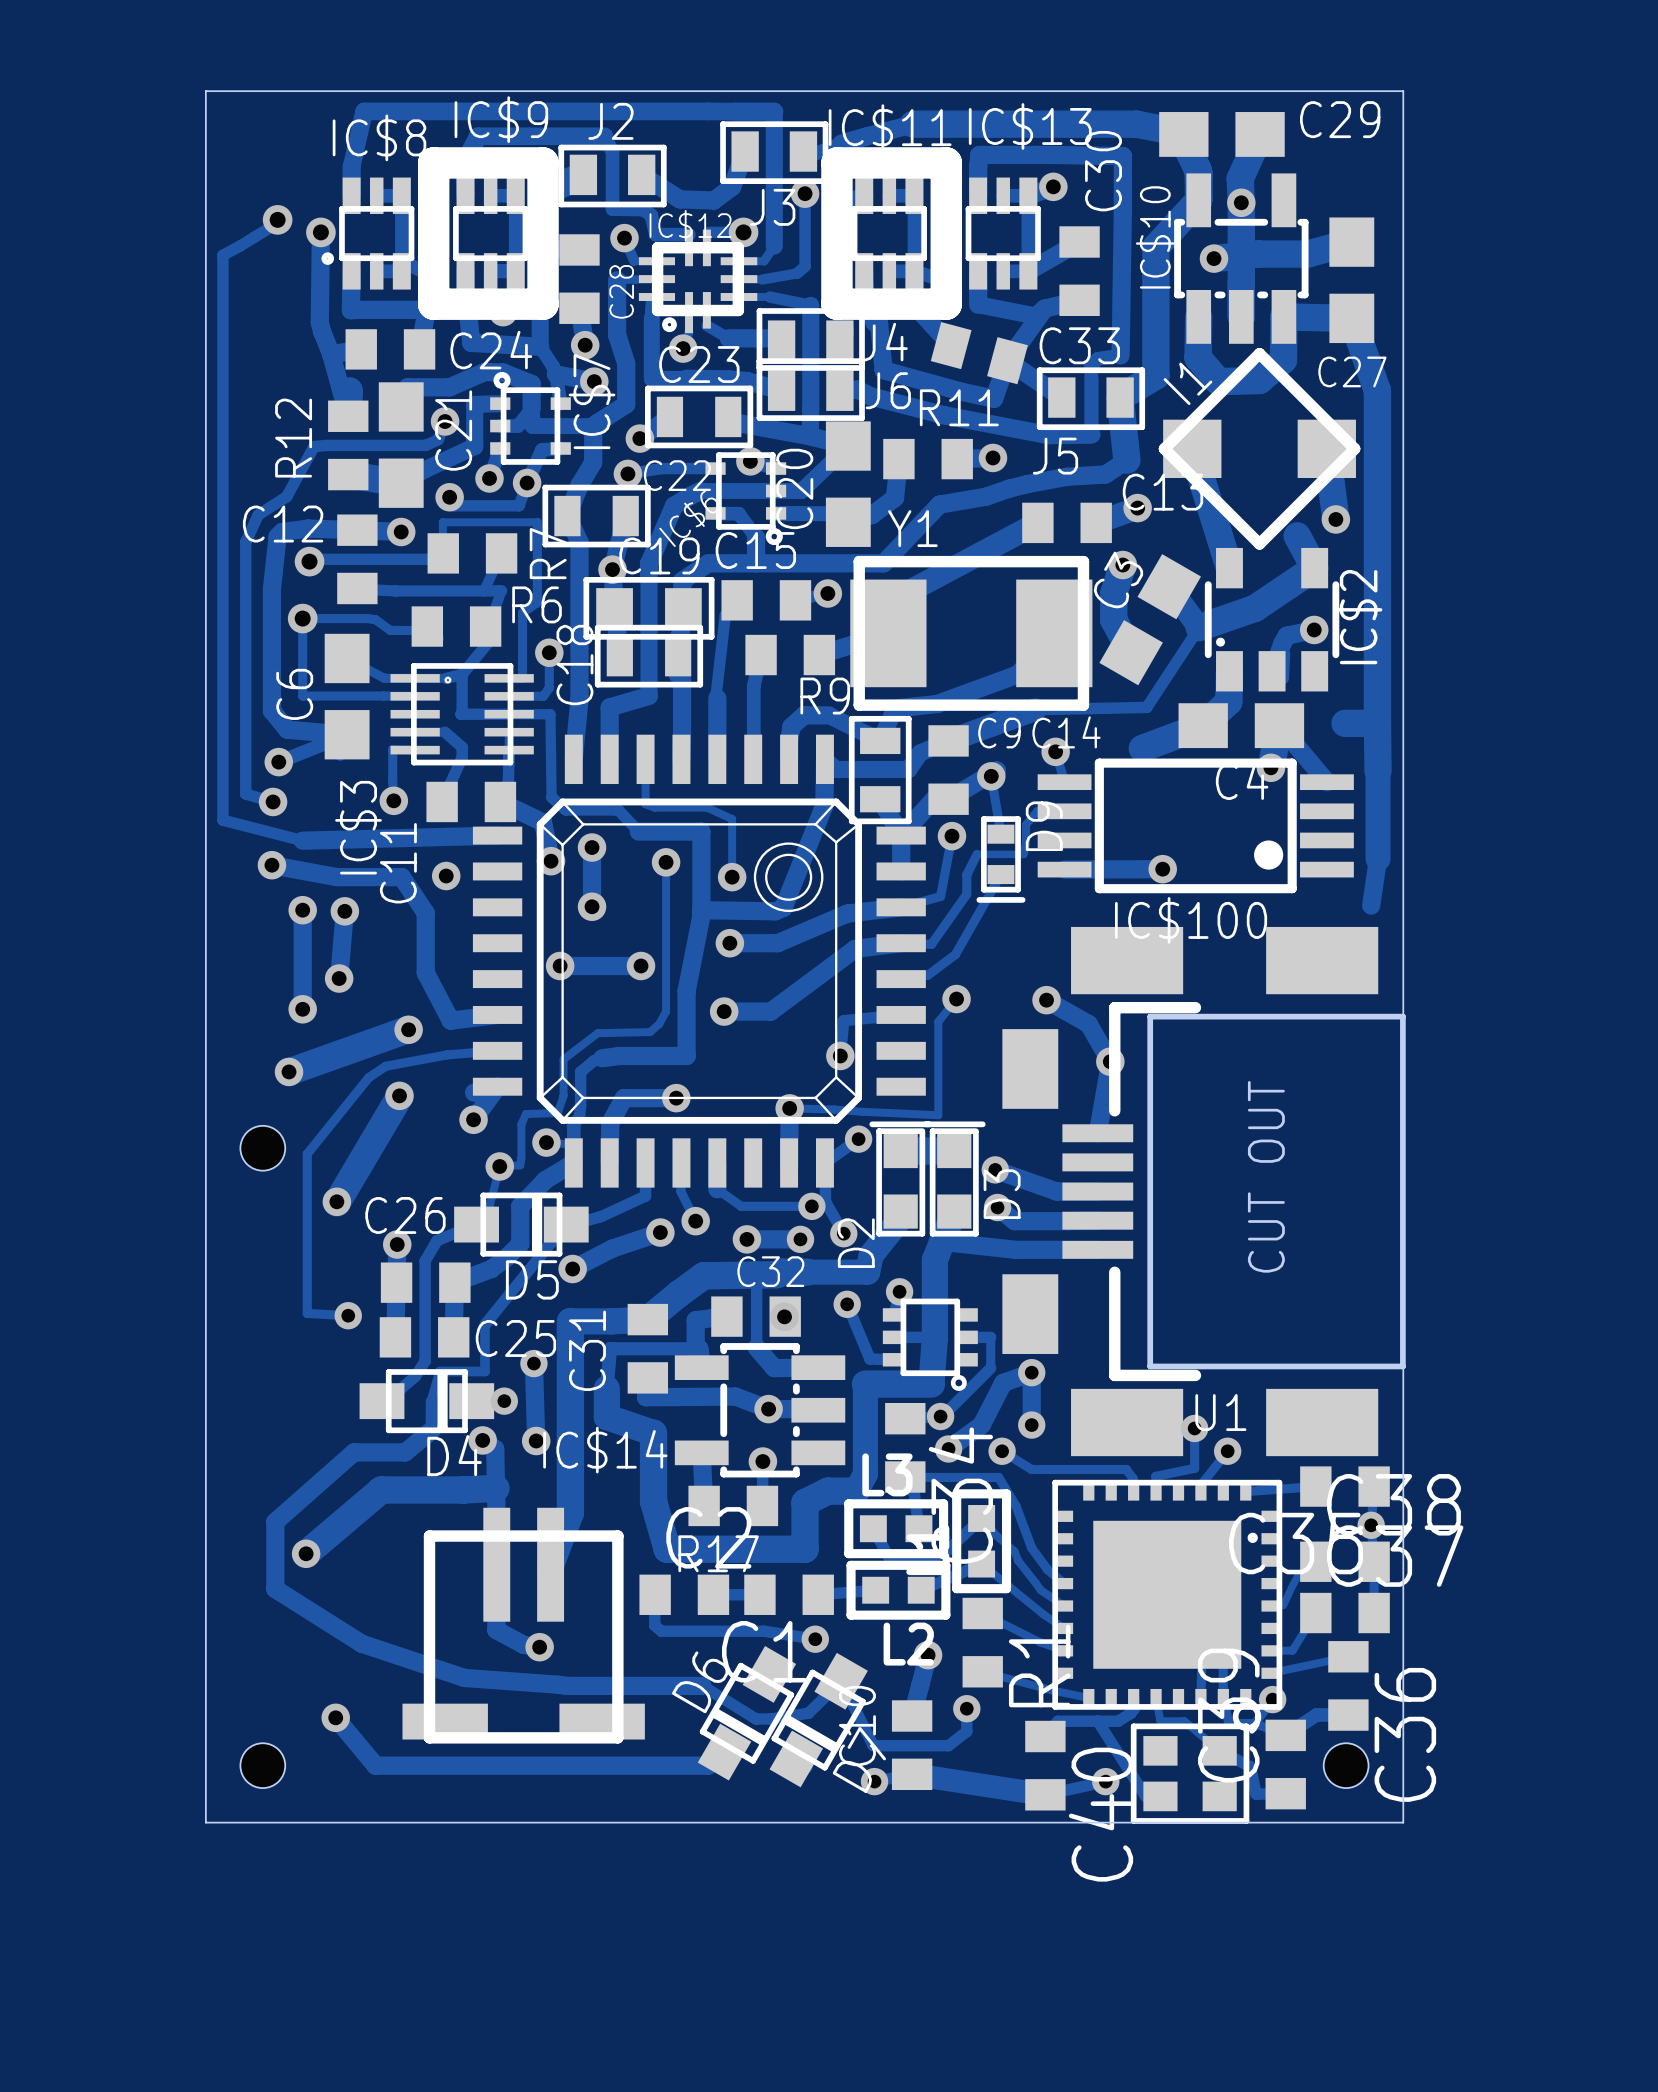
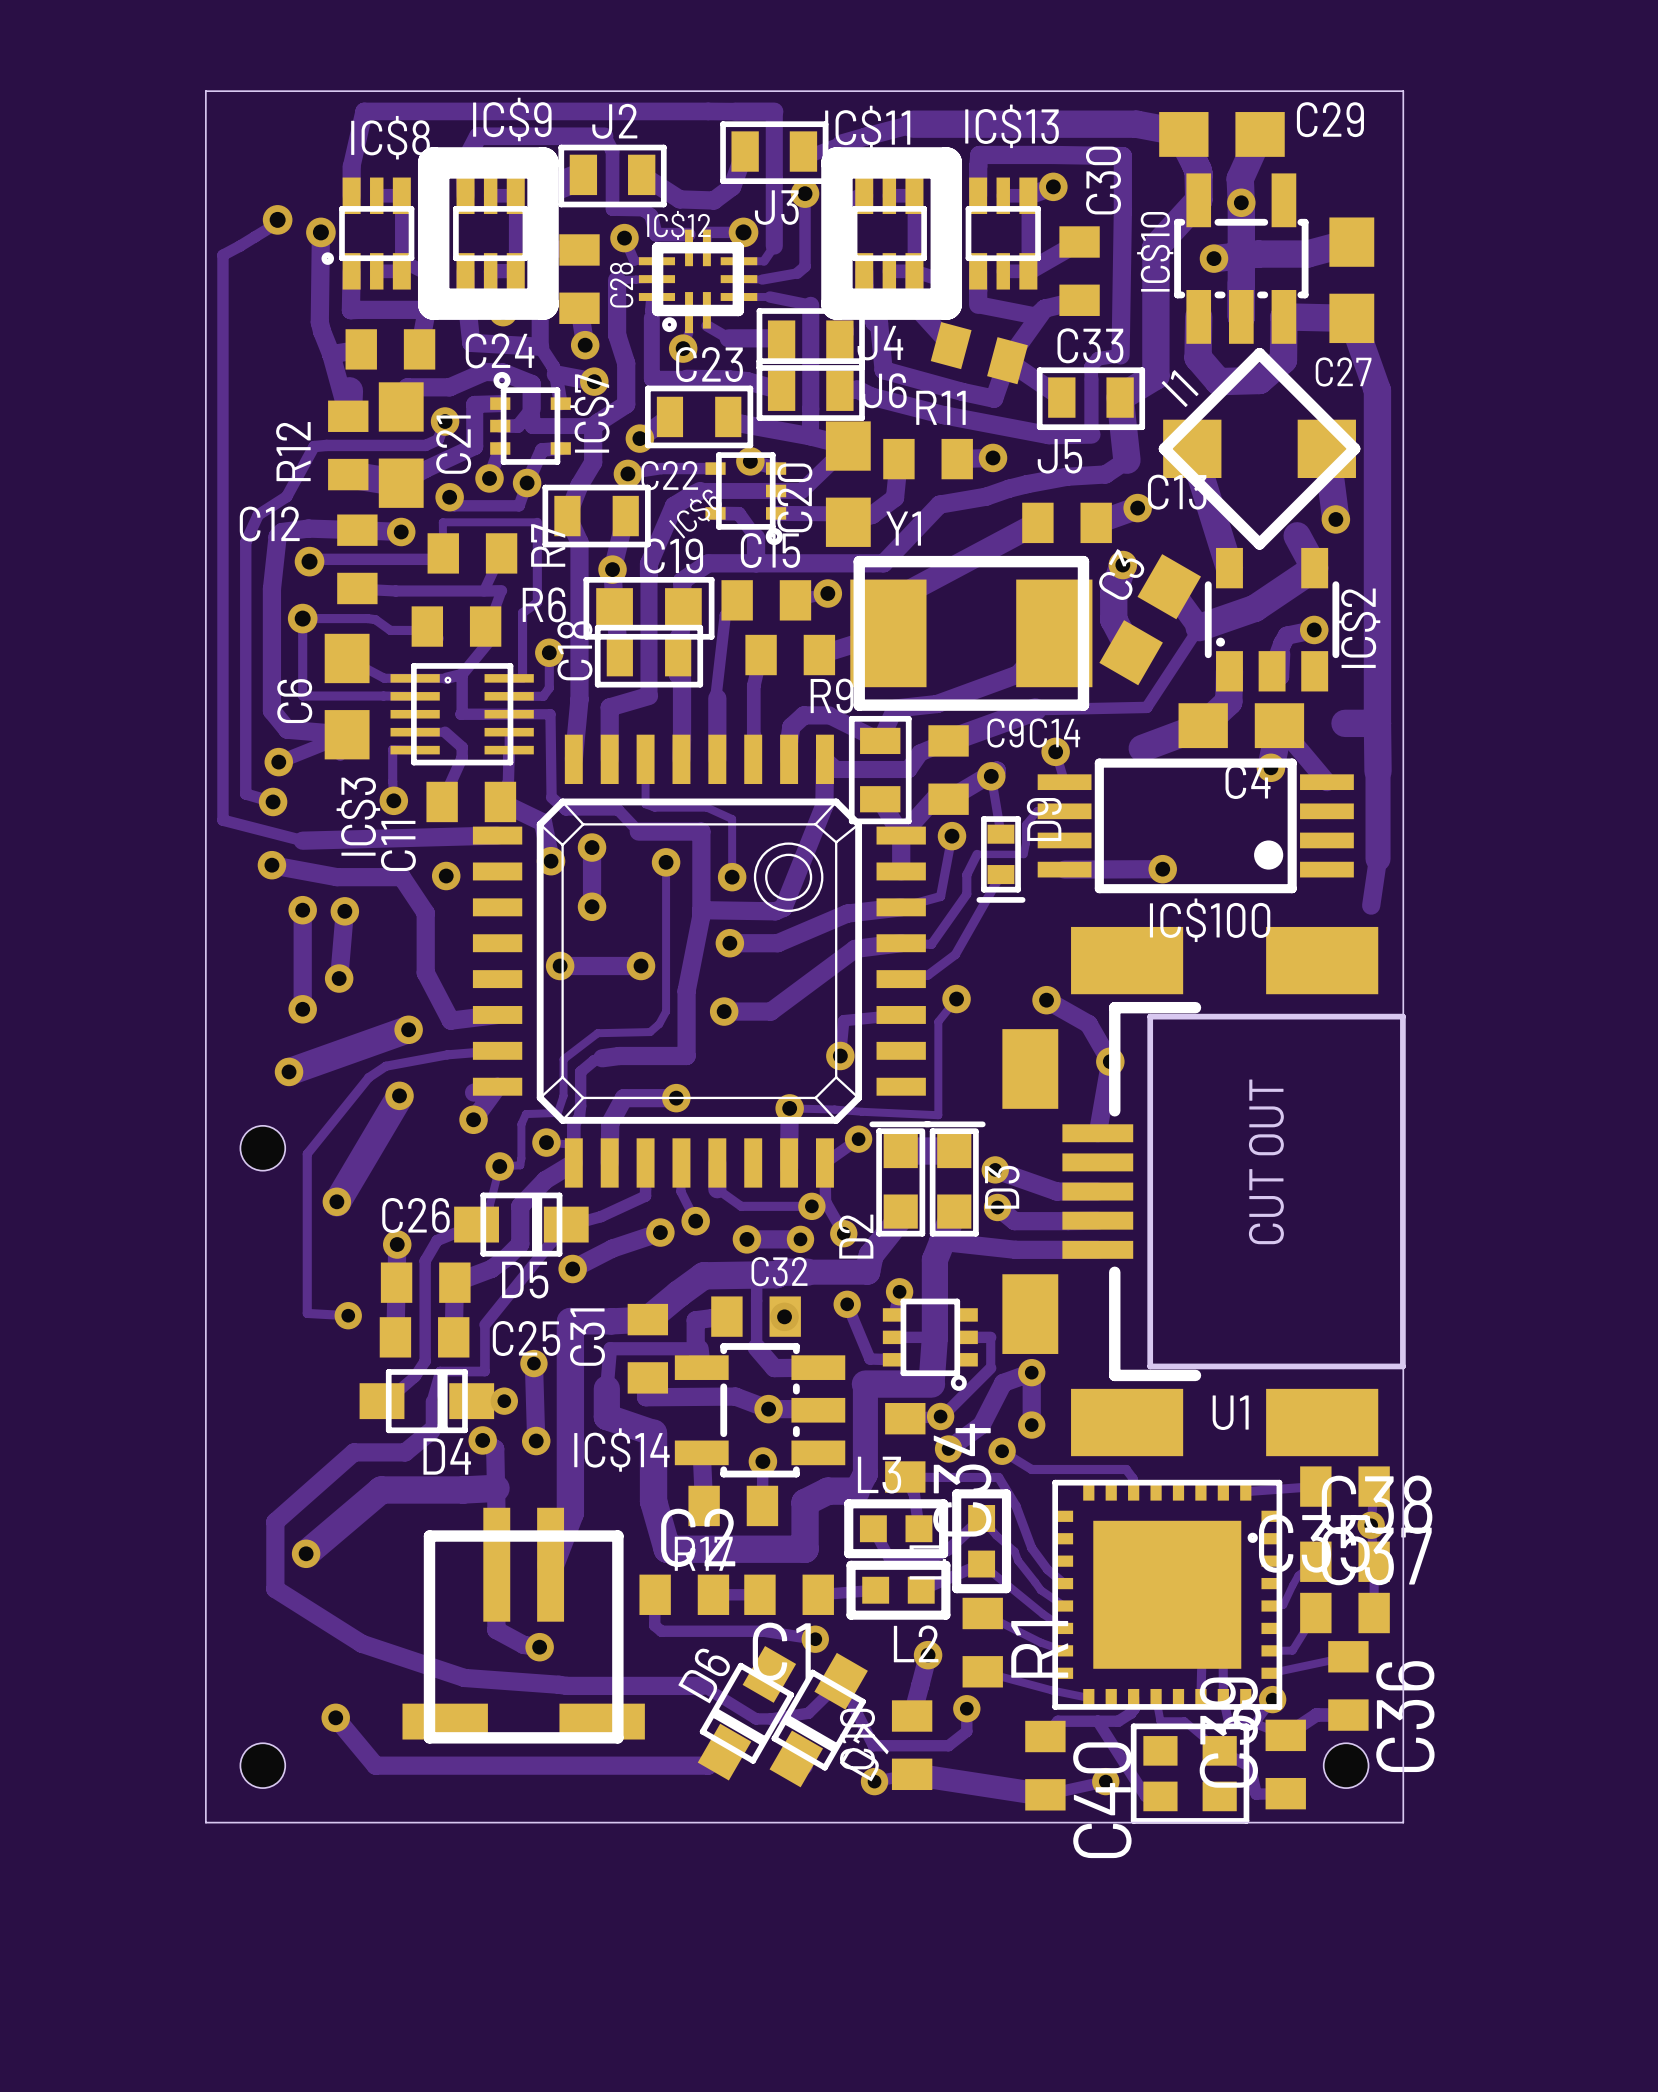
track: (1194, 1428) (1194, 1468) (1155, 1476) (1156, 1491) -> none
via: (1194, 1428) -> none
track: (1227, 1451) (1202, 1483) (1200, 1491) -> none
via: (1227, 1451) -> none

